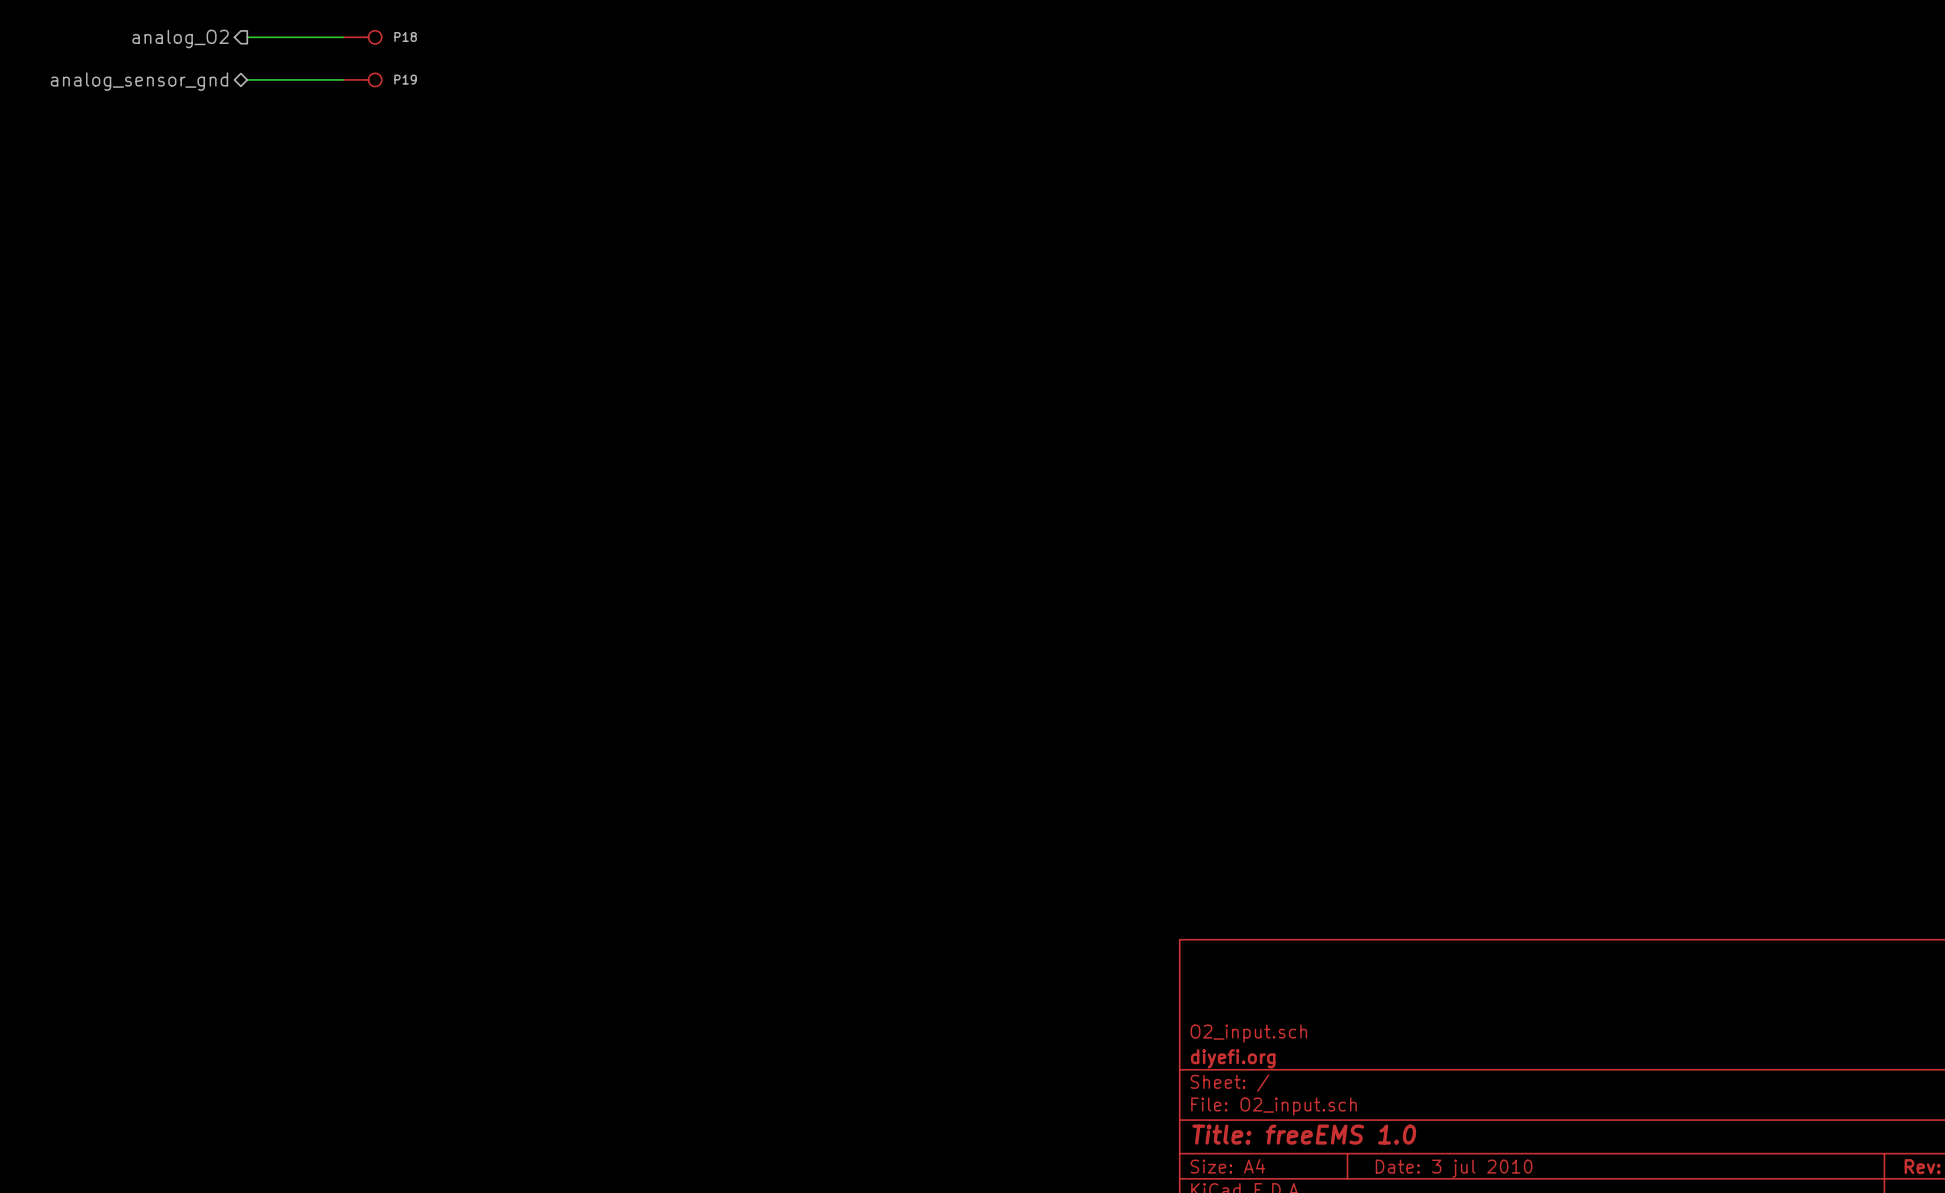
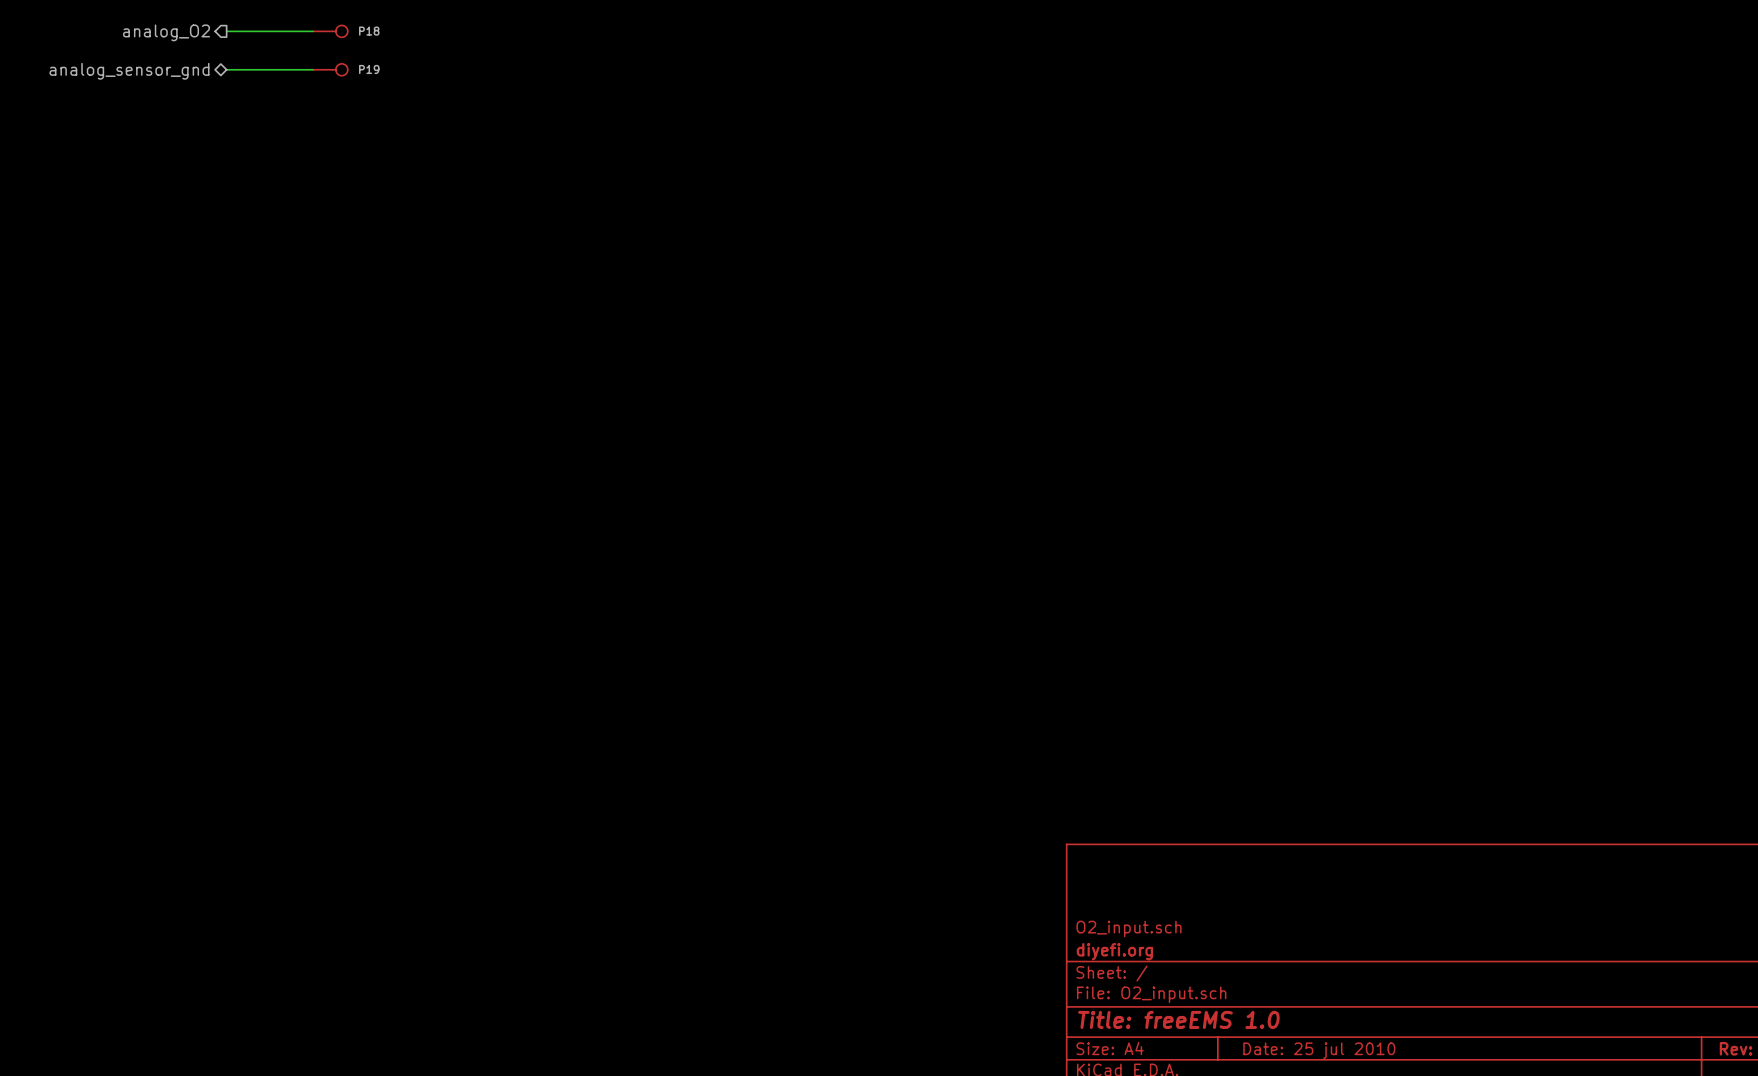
title block: Date: 3 jul 2010 (1454, 1168) -> Date: 25 jul 2010 (1319, 1050)

